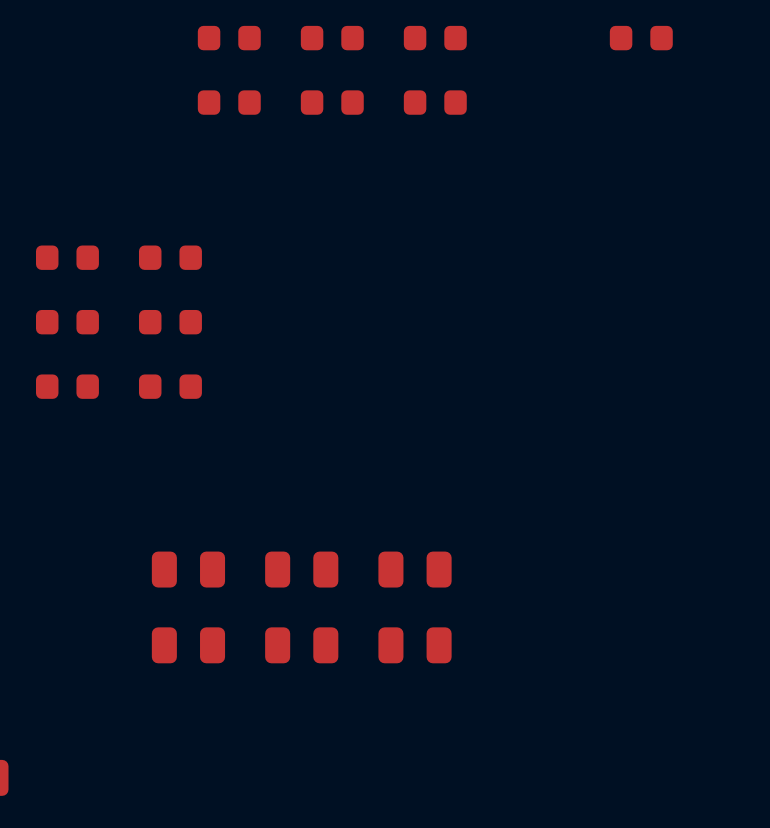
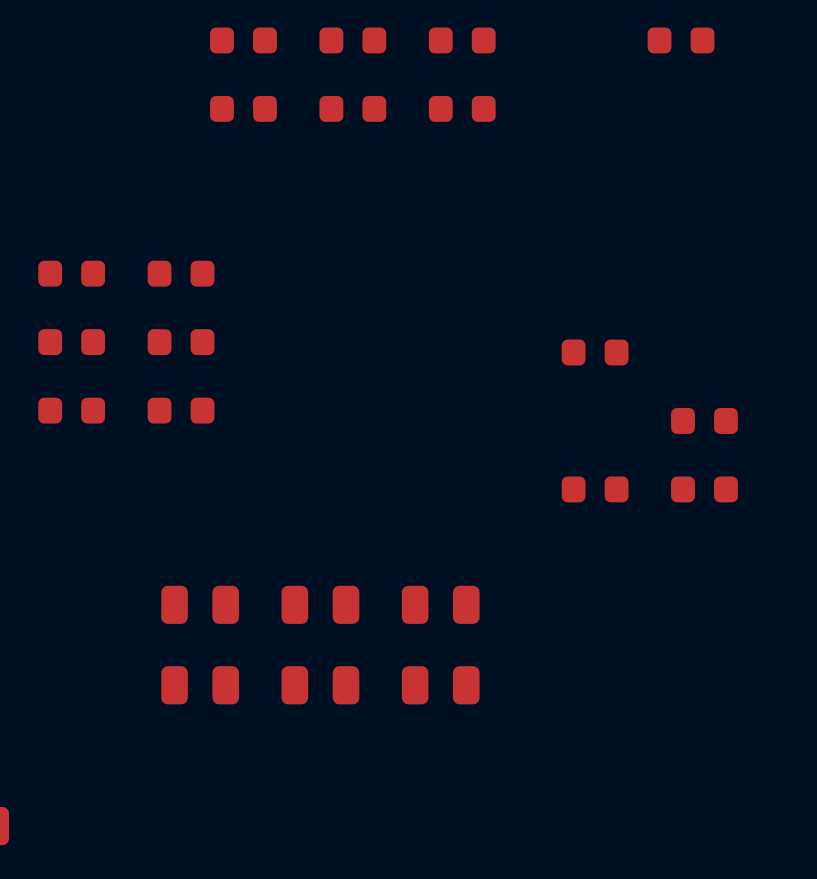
part: none -> (595, 352)
part: none -> (704, 420)
part: none -> (595, 489)
part: none -> (704, 489)

